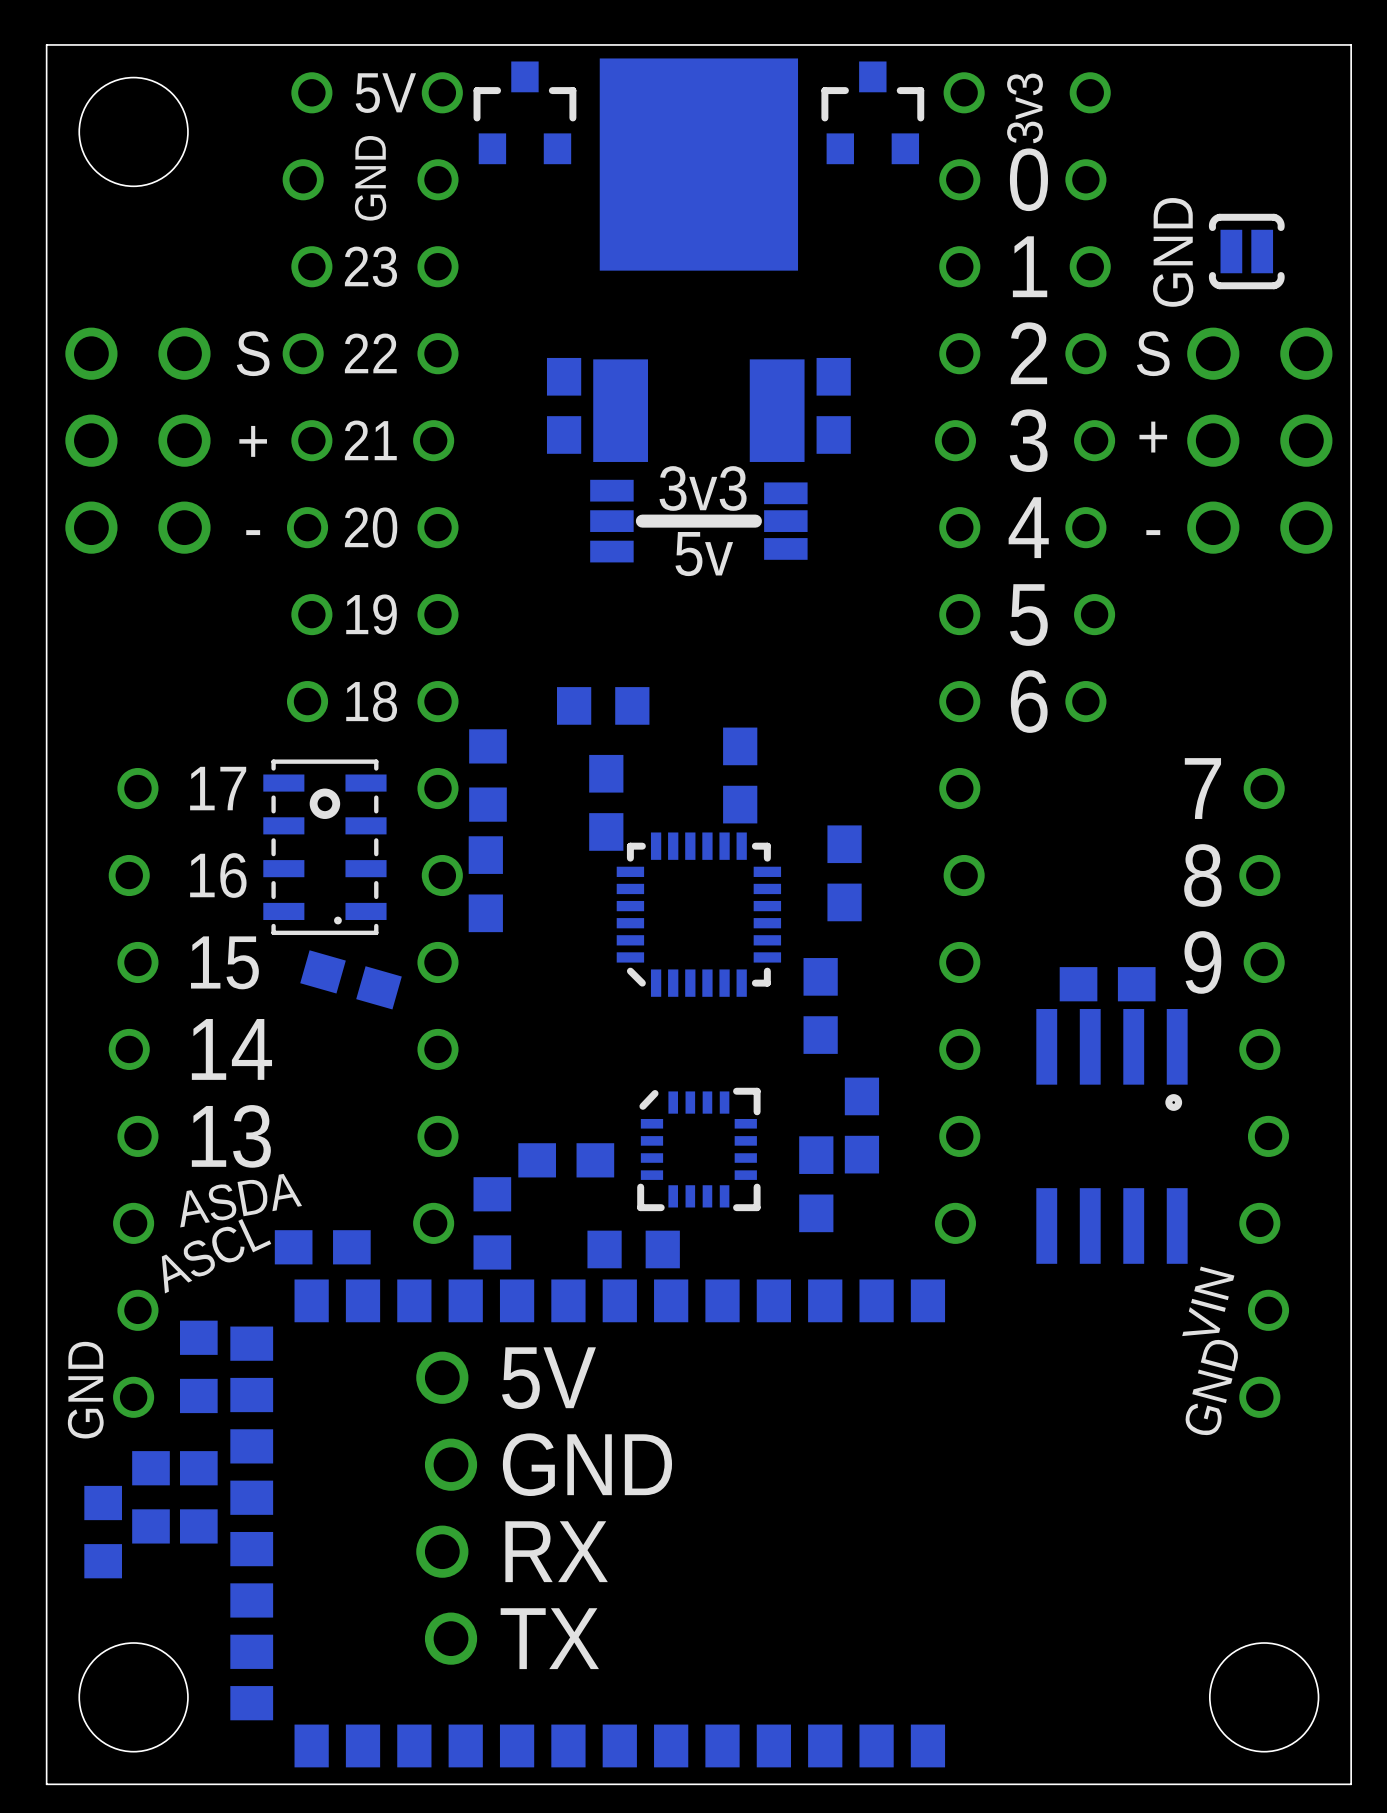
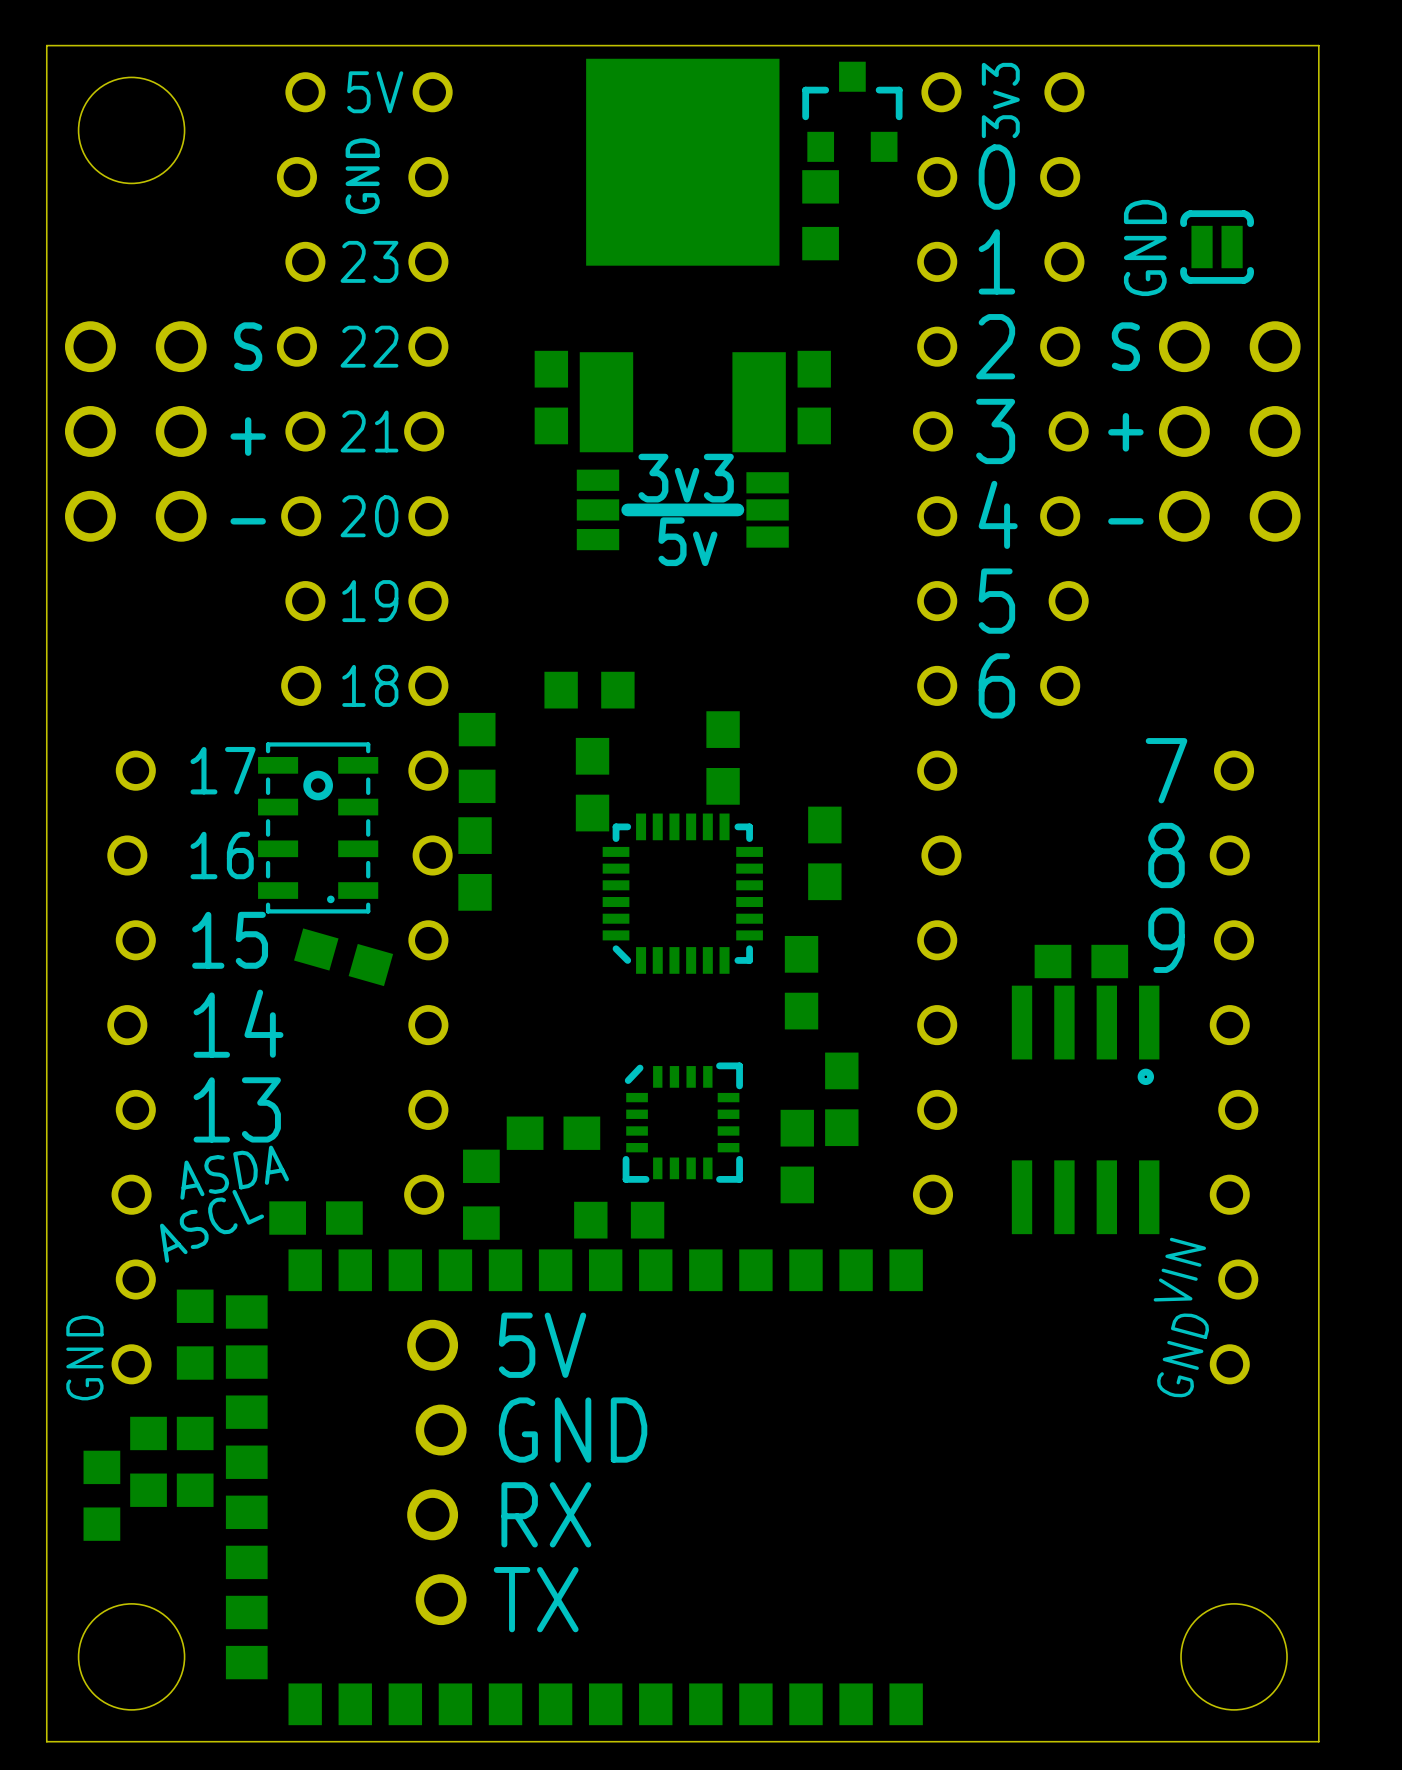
part: (524, 112) -> none
part: none -> (820, 215)

